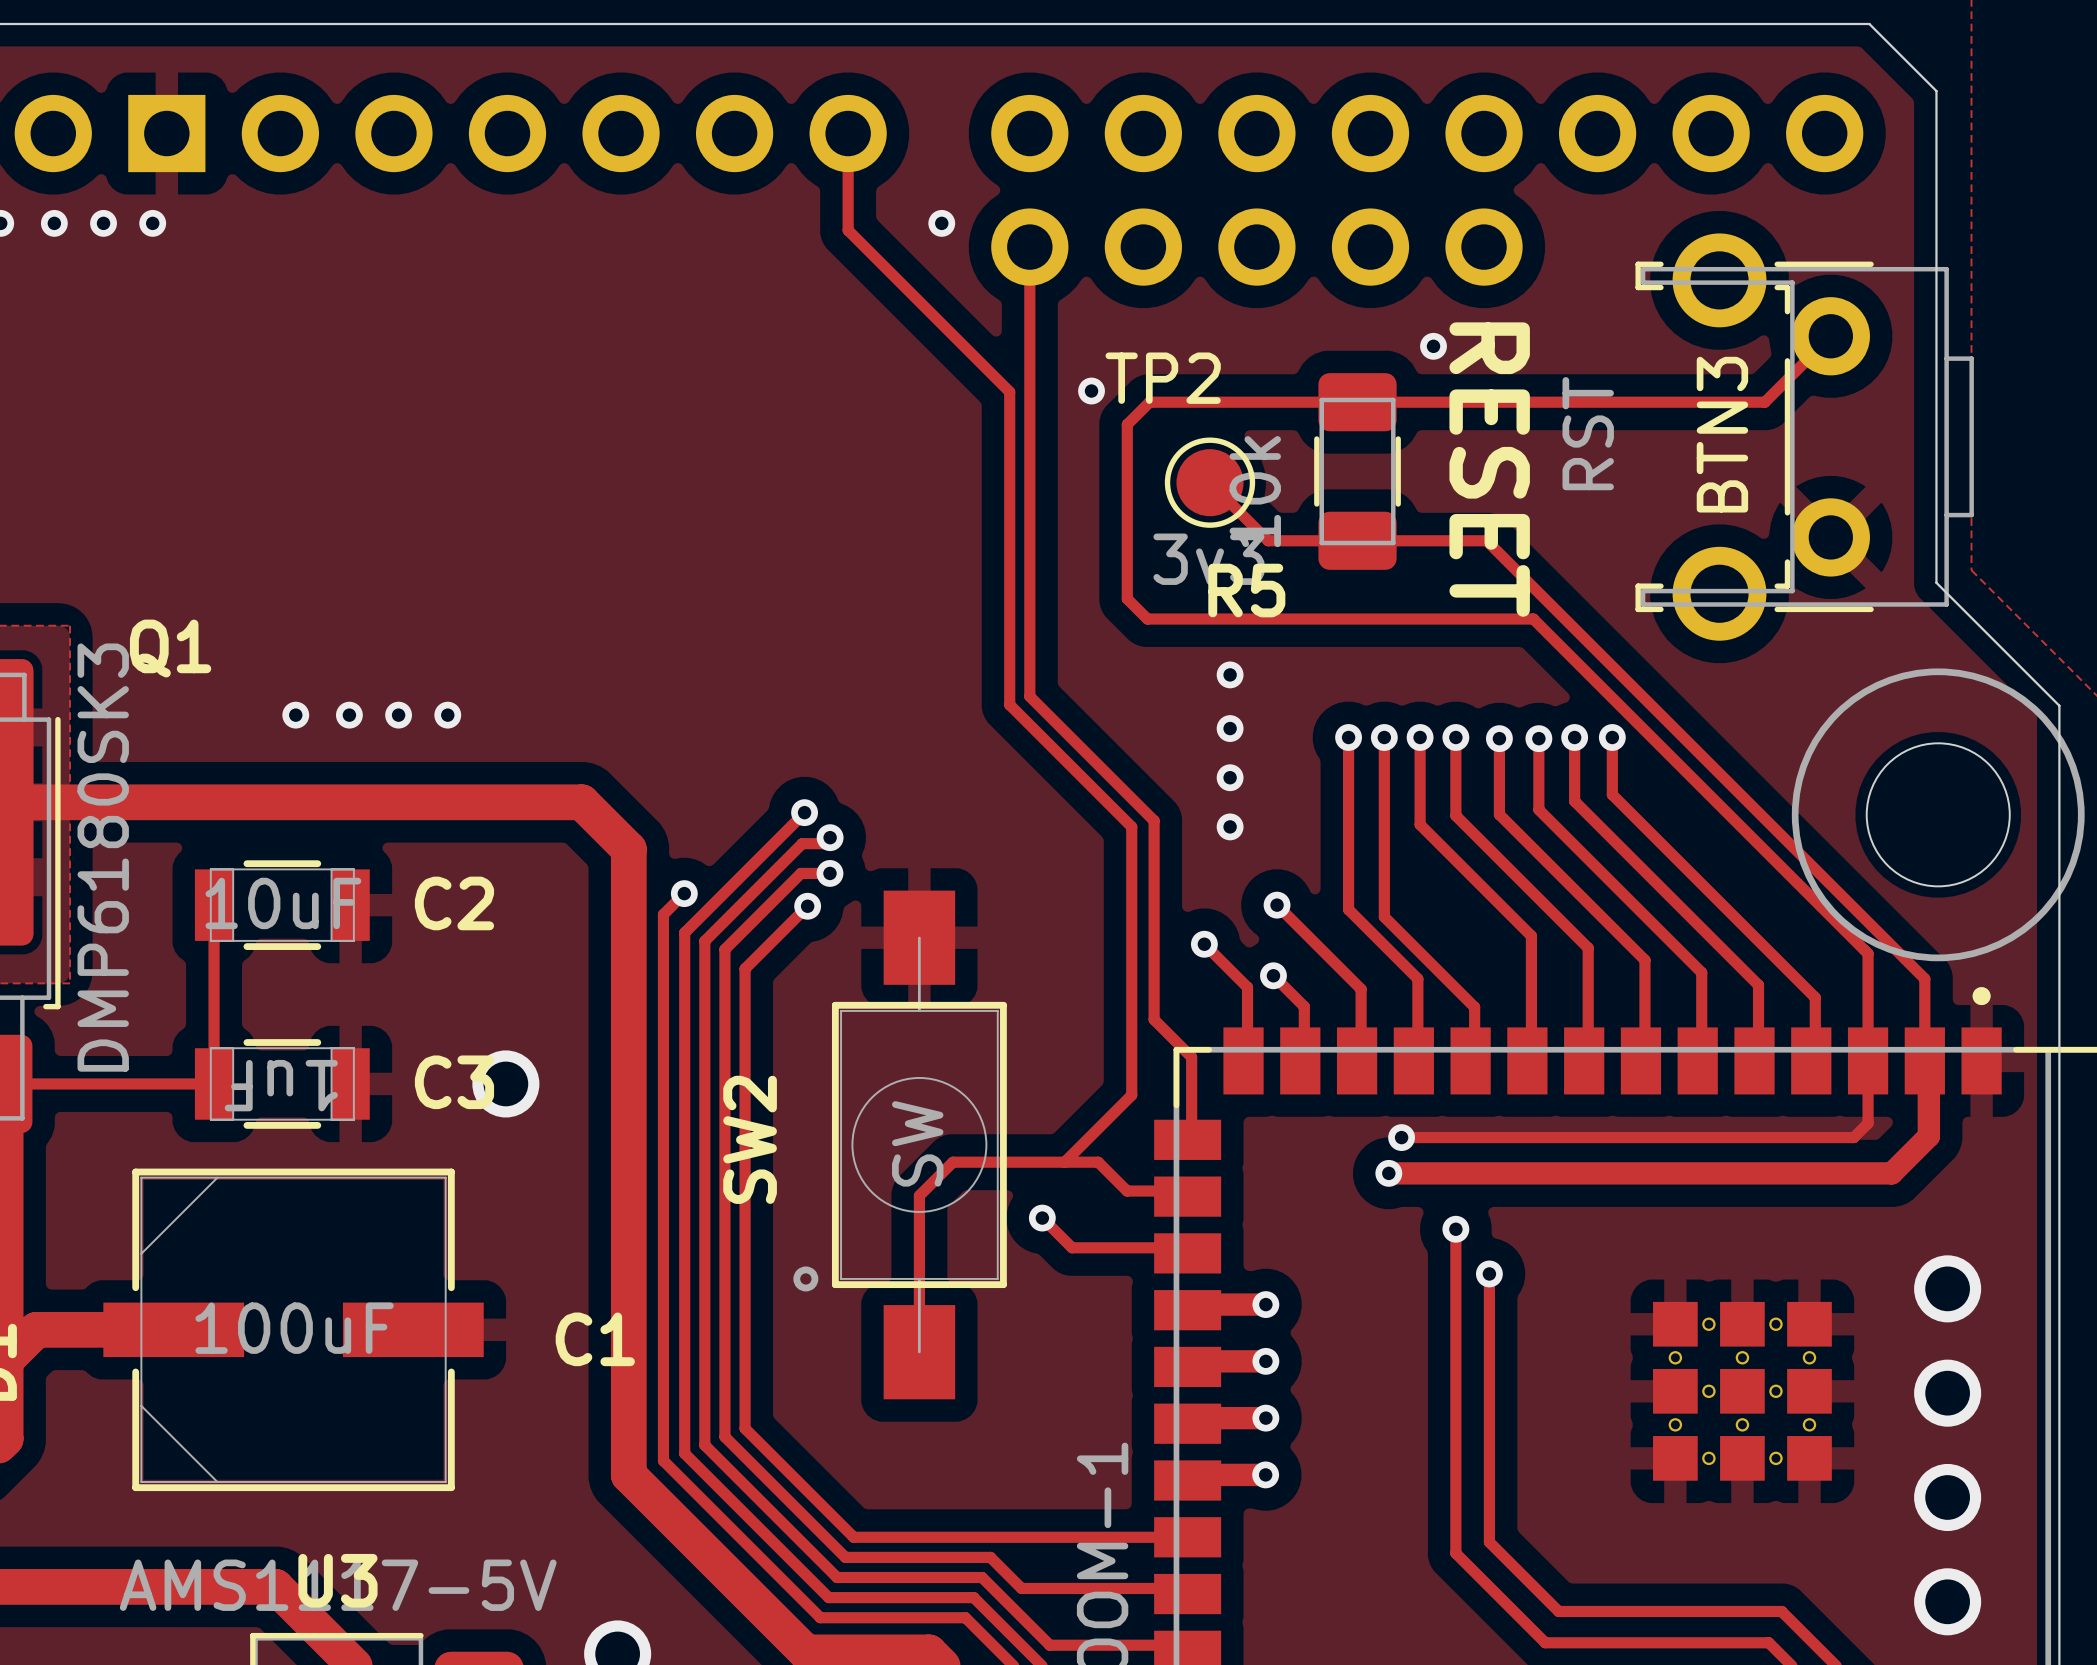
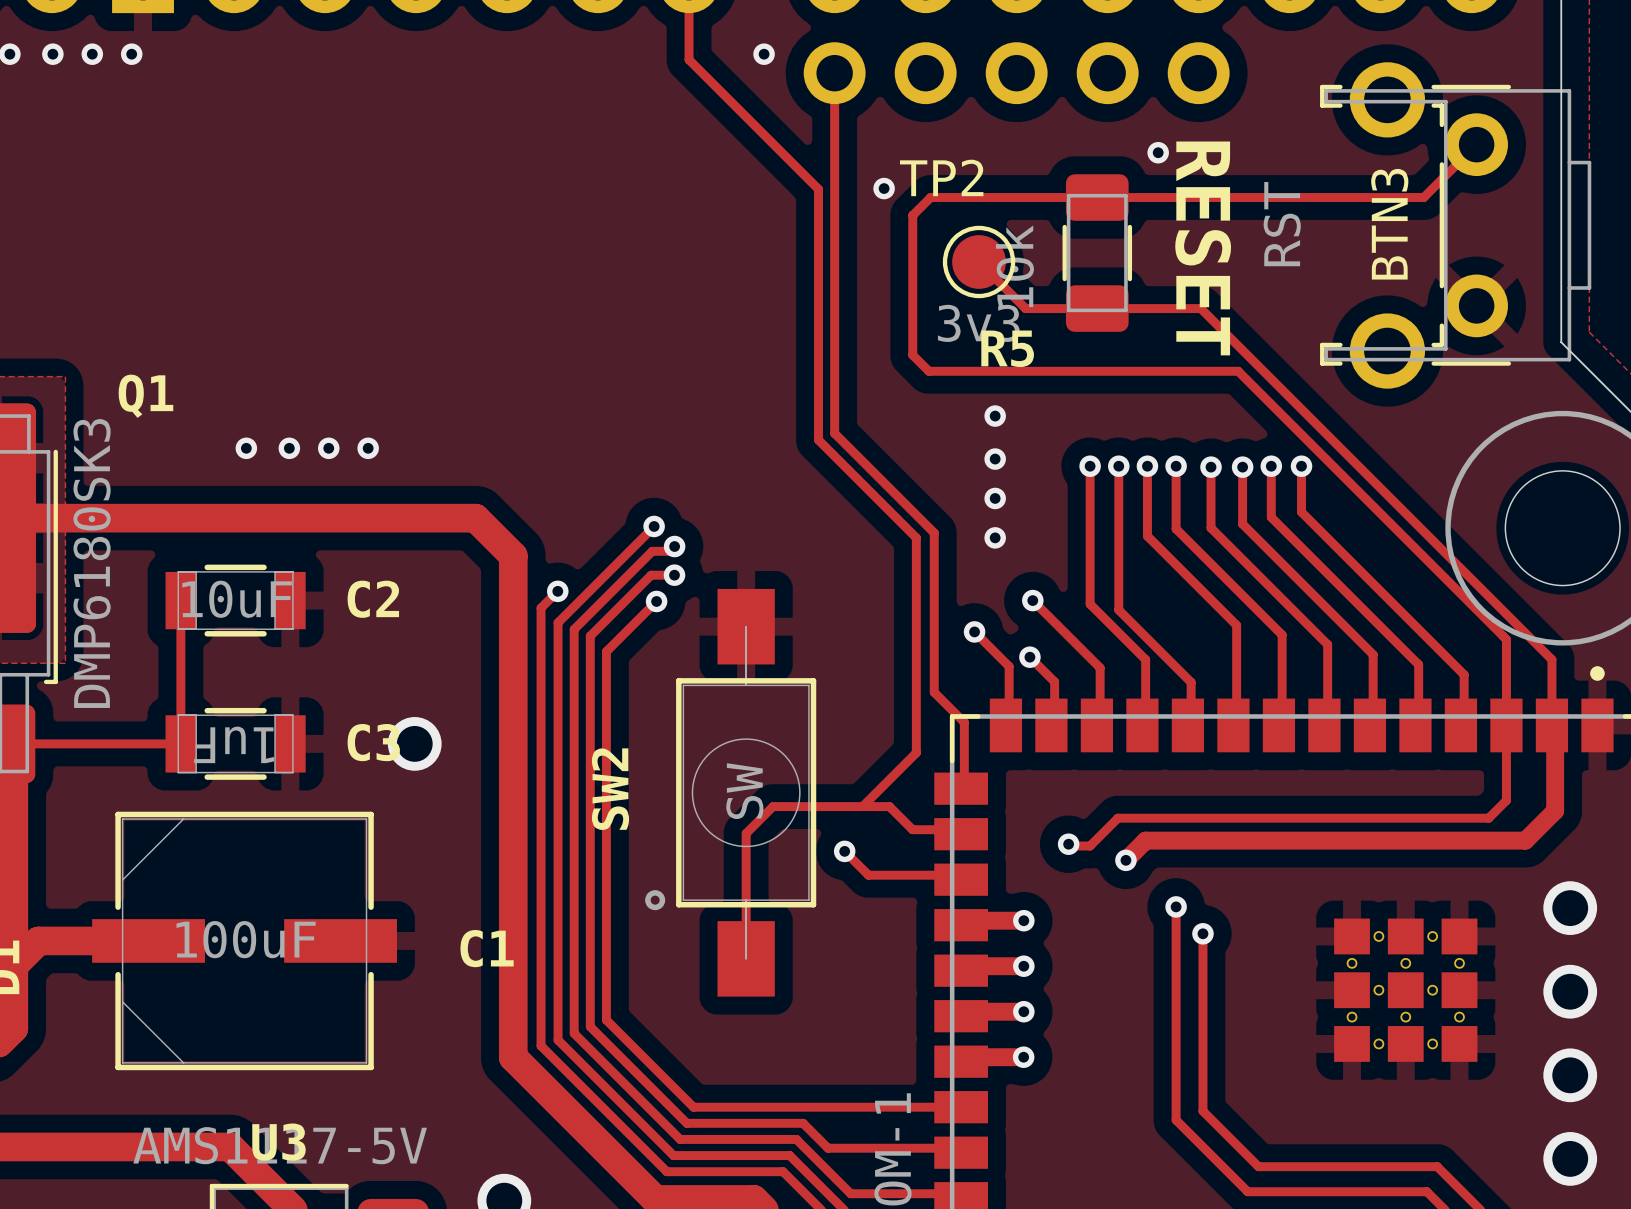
track: (1868, 1123) (1853, 1137) (1401, 1137) -> (1506, 775) (1506, 800) (1488, 818) (1117, 818) (1090, 846) (1070, 846) (1068, 844)
track: (1928, 1136) (1891, 1173) (1388, 1173) -> (1555, 785) (1555, 810) (1525, 840) (1145, 840) (1125, 860)
via: (1401, 1137) -> none
via: (1388, 1173) -> none
via: none -> (1068, 844)
via: none -> (1125, 860)
track: (1455, 1229) (1455, 1287) -> none
via: (1455, 1229) -> none
track: (1489, 1273) (1489, 1320) -> none
via: (1489, 1273) -> none
via: none -> (1176, 906)
via: none -> (1202, 933)

